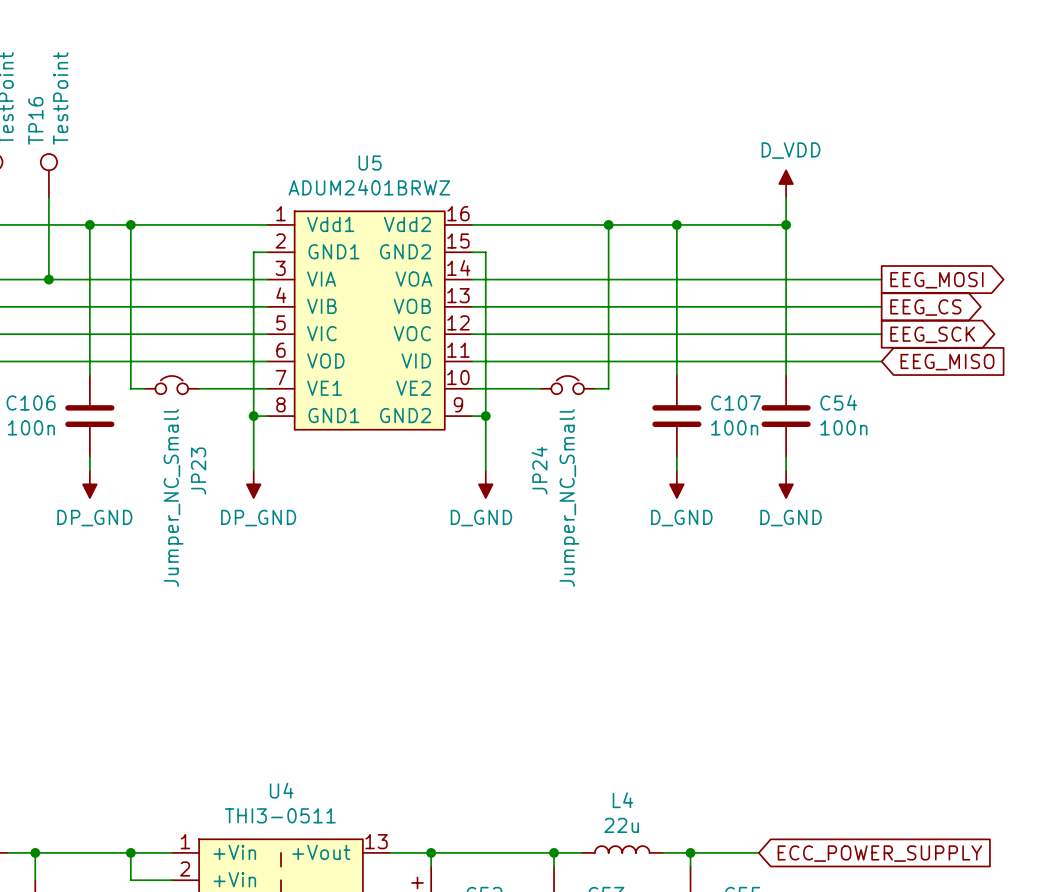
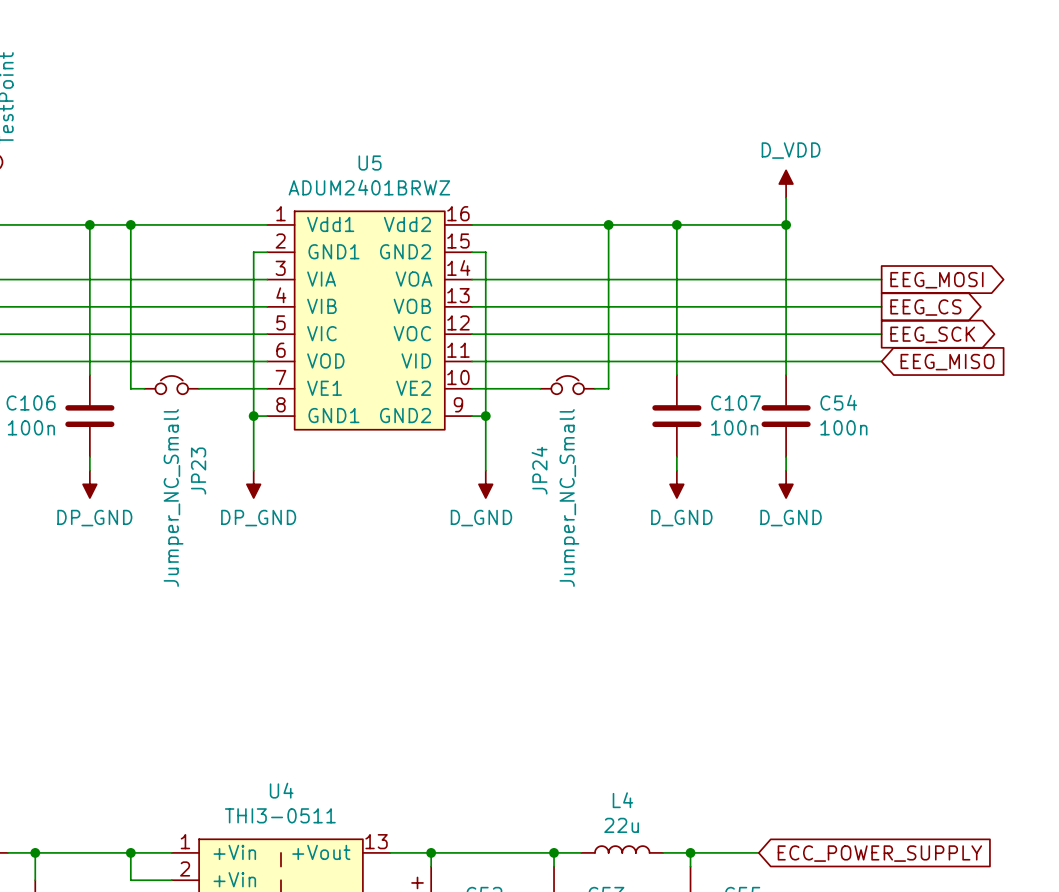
TP16: TestPoint (48, 175) -> none
wire: (48, 197) (48, 279) -> none
junction: (48, 279) -> none

